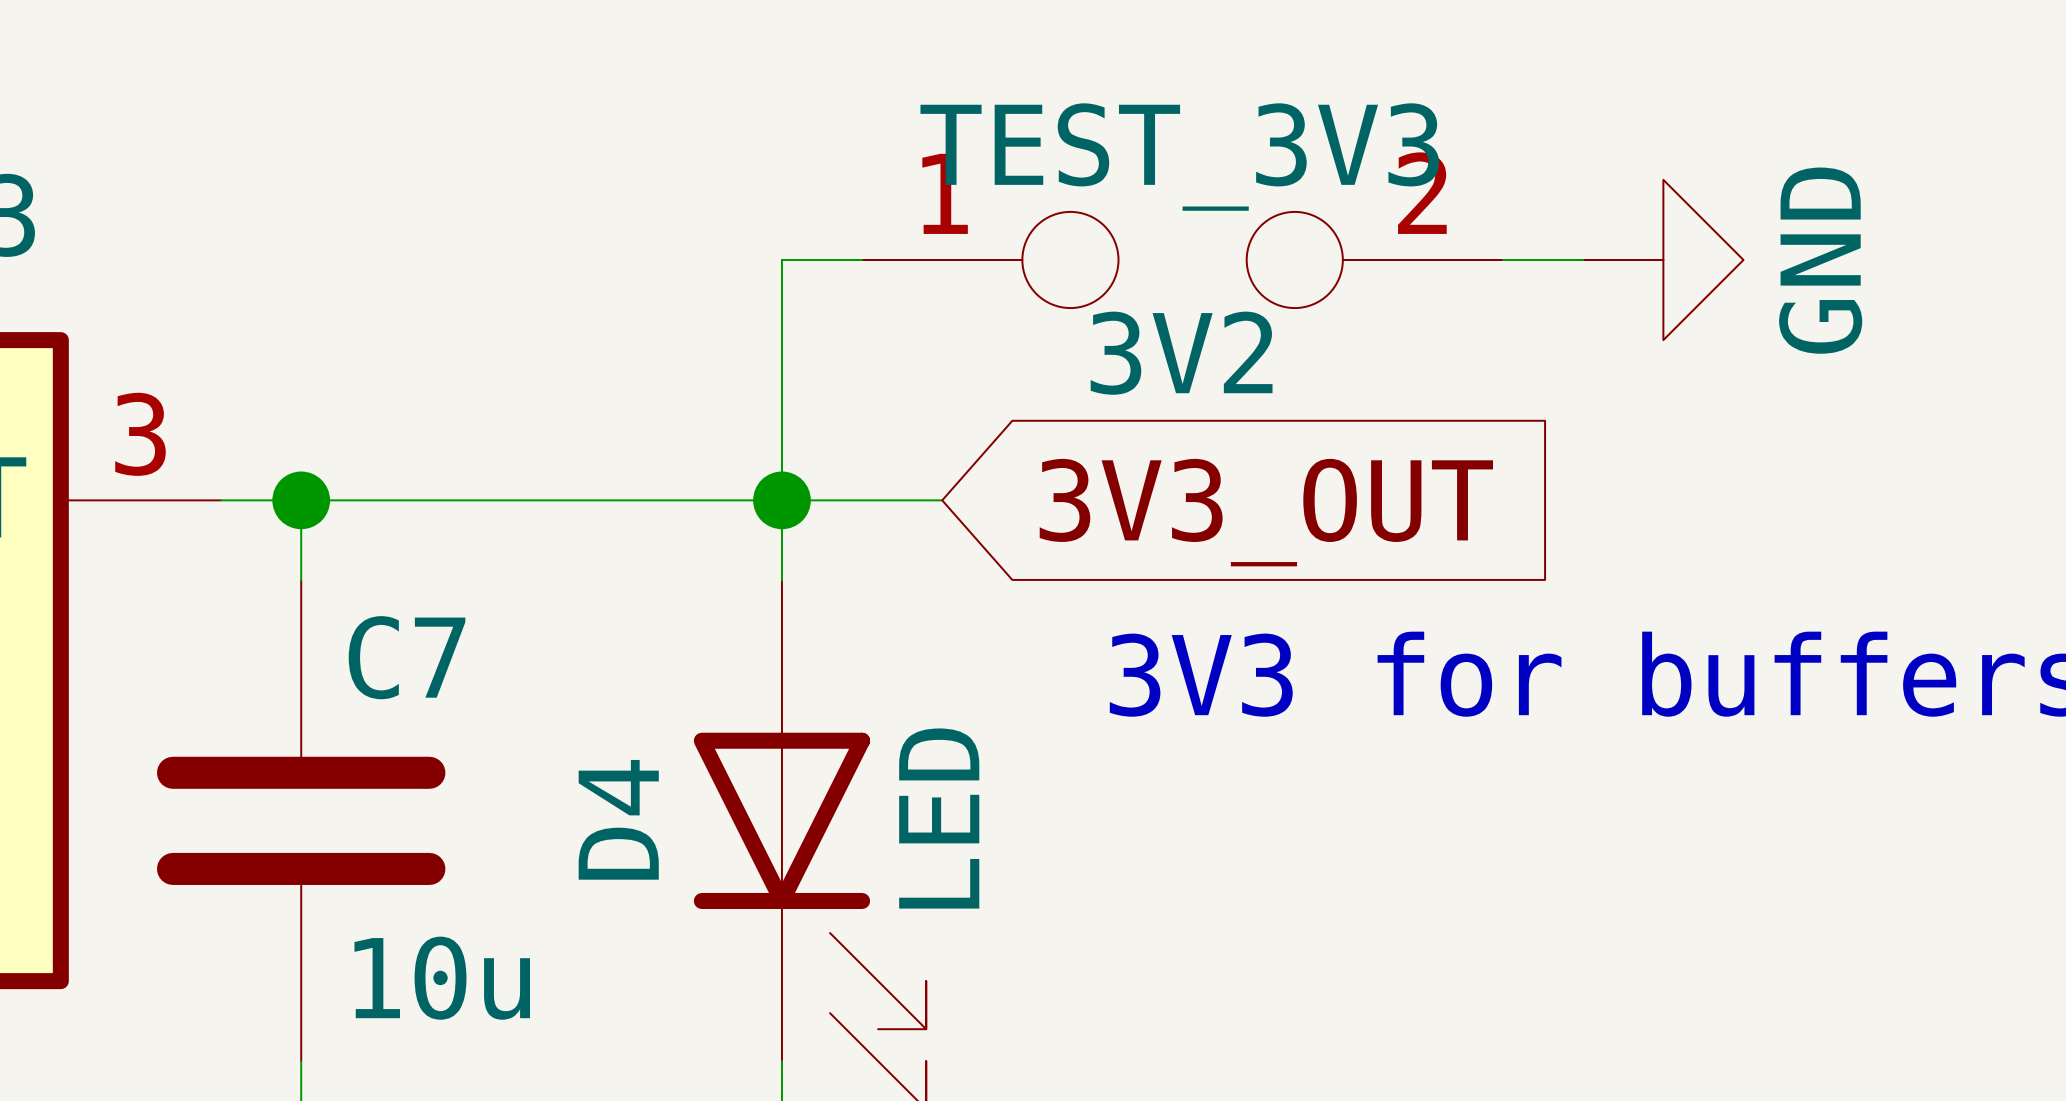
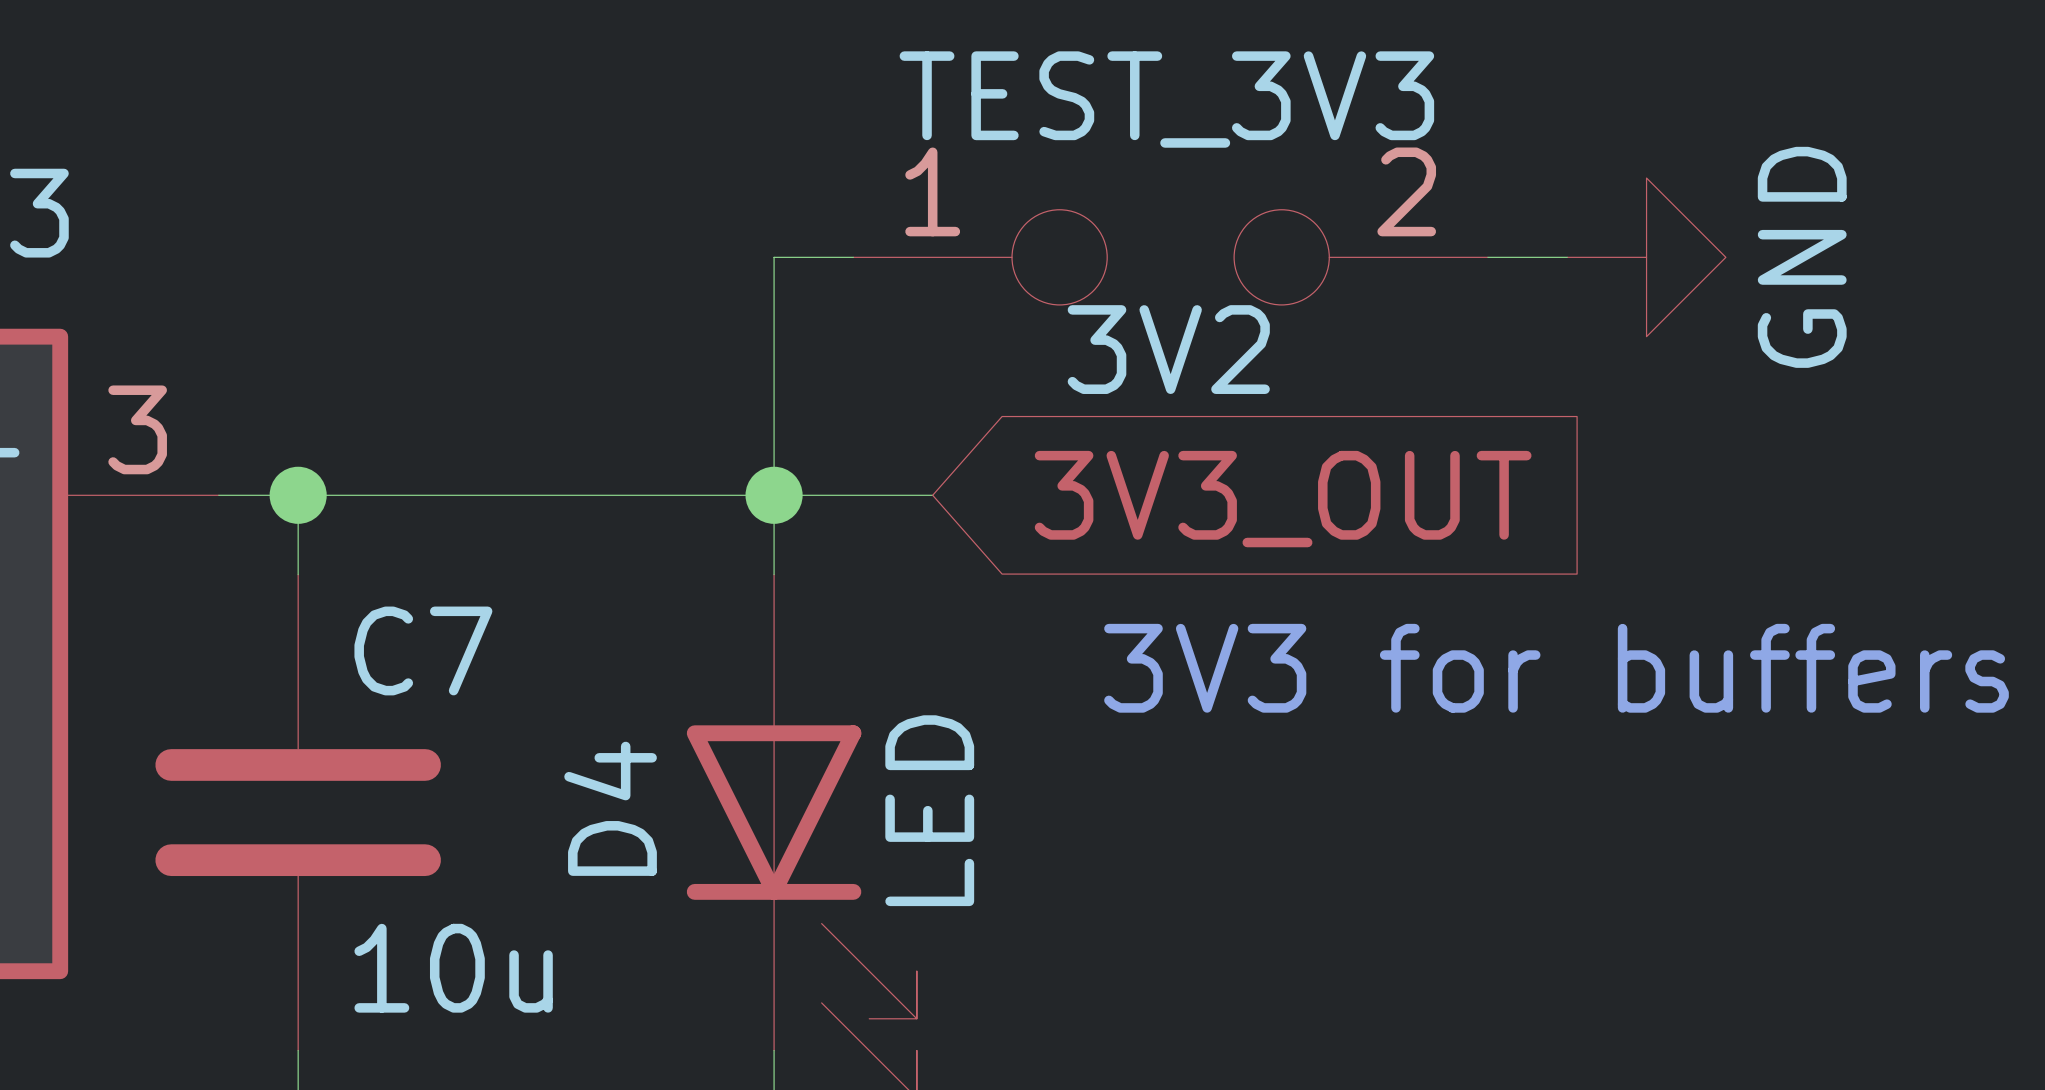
3V2 value position: TEST_3V3 (1179, 157) -> TEST_3V3 (1166, 99)

